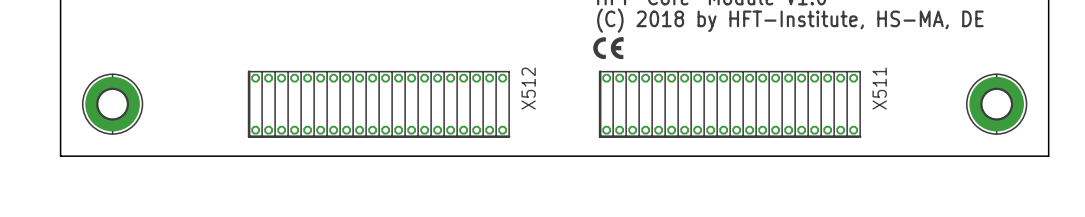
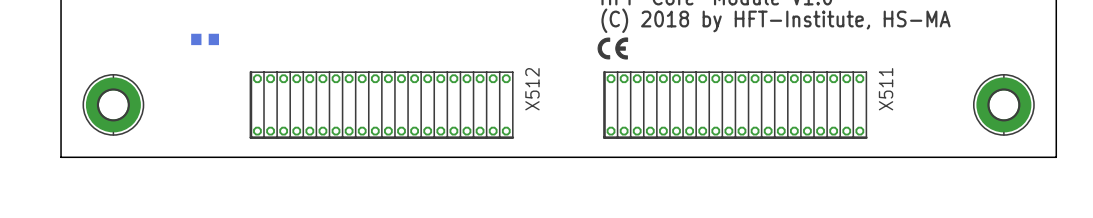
text: (C) 2018 by HFT-Institute, HS-MA, DE (790, 20) -> (C) 2018 by HFT-Institute, HS-MA (776, 20)
part: none -> (205, 39)

